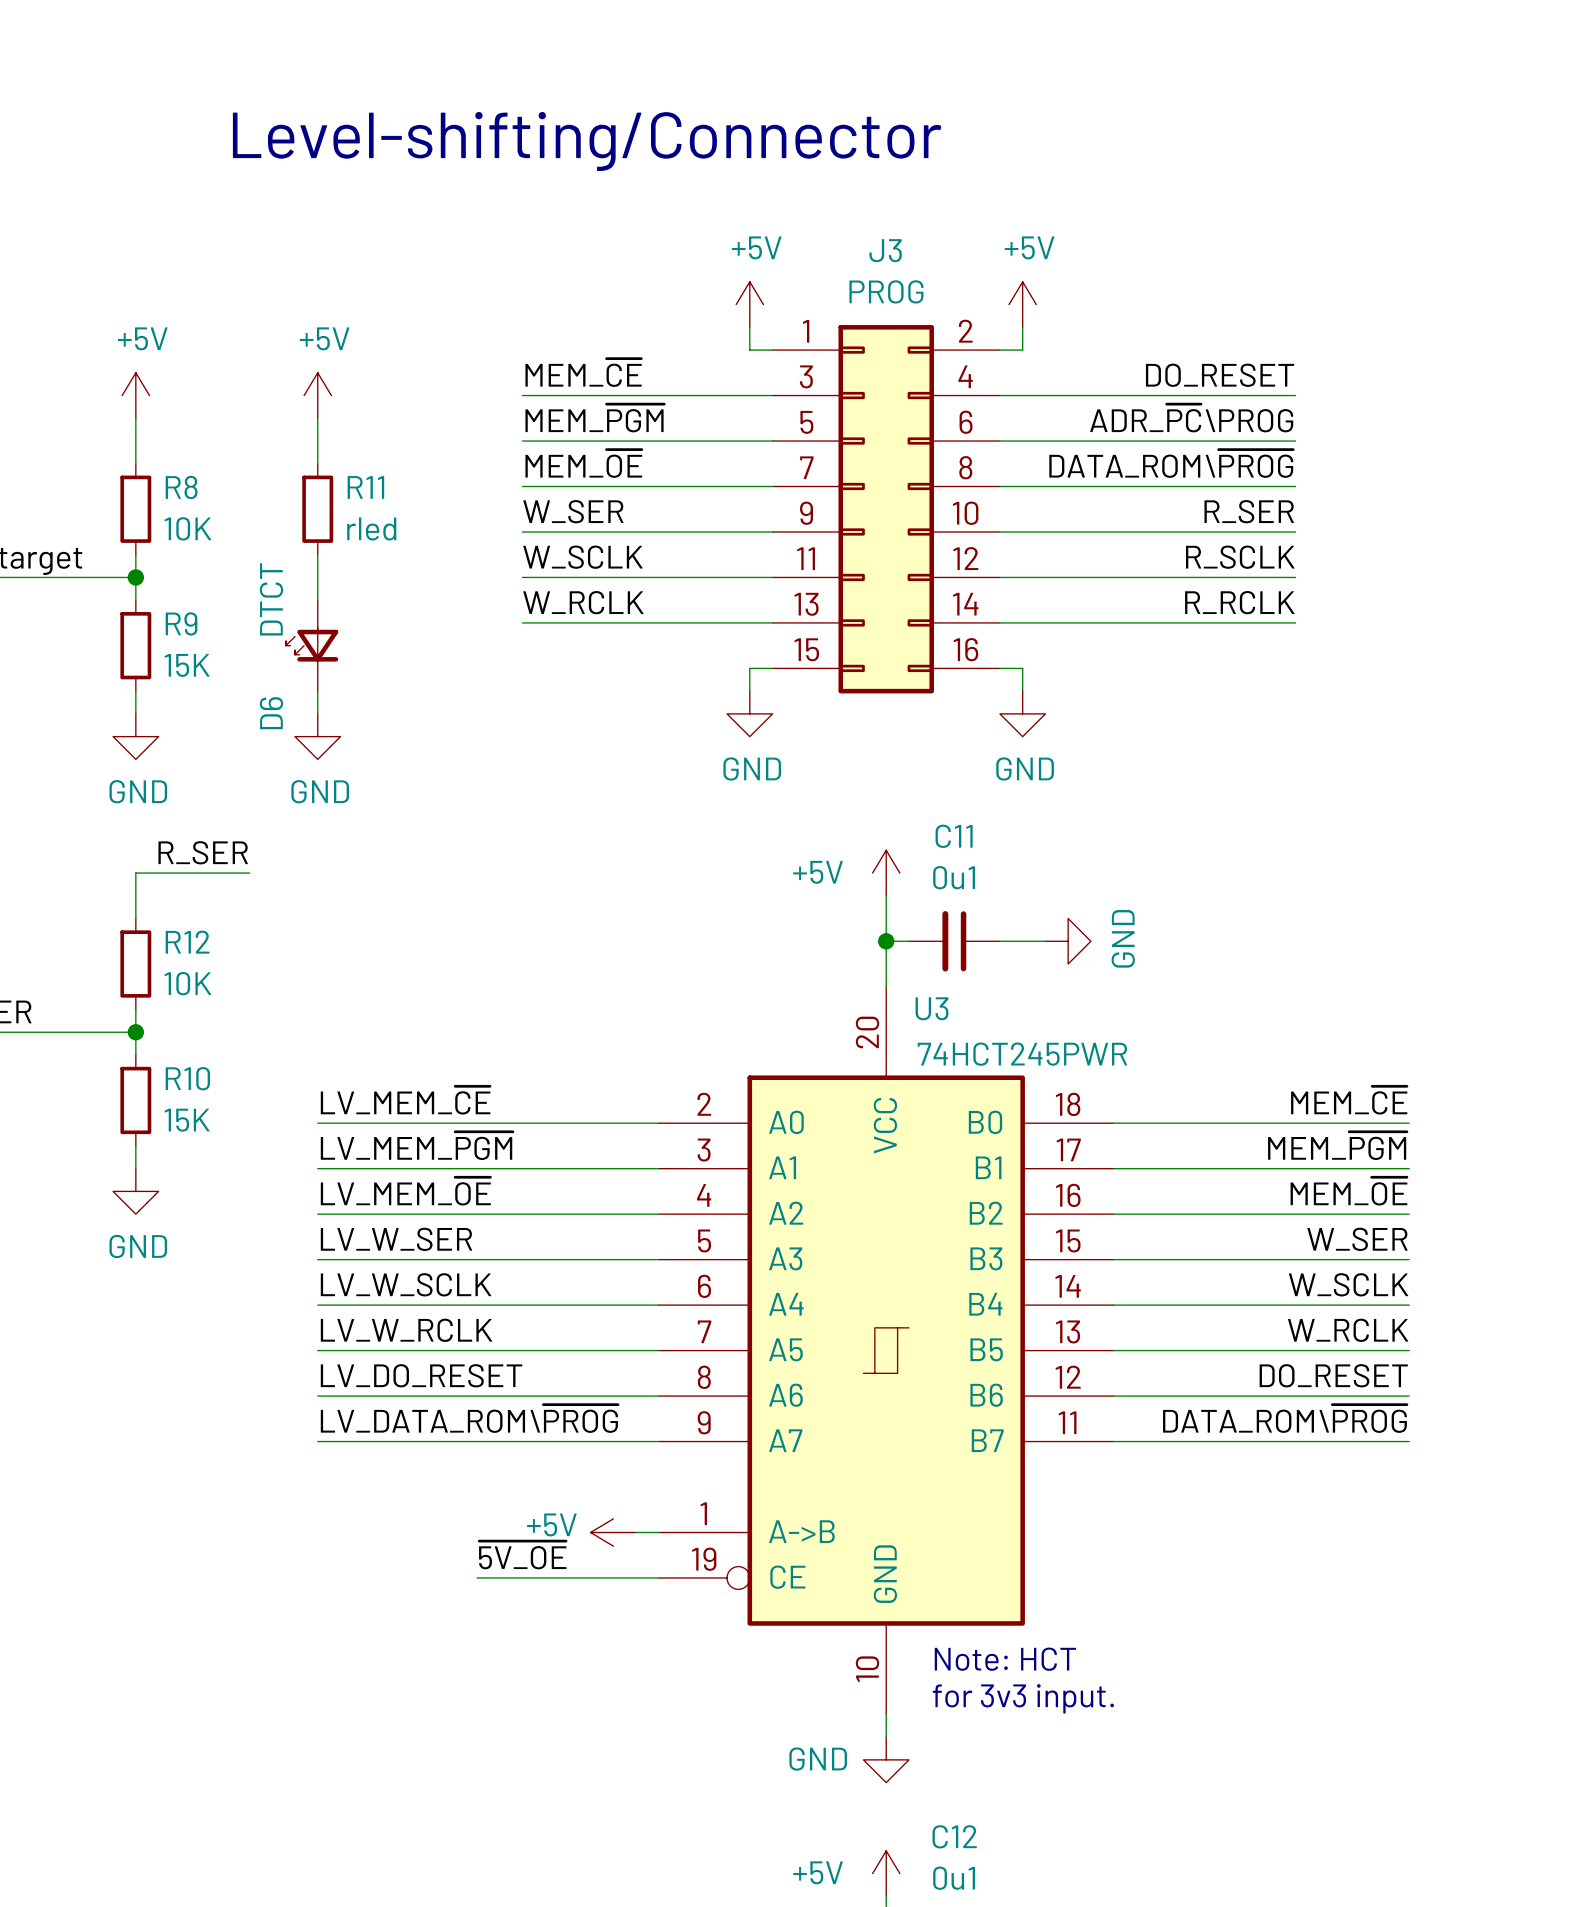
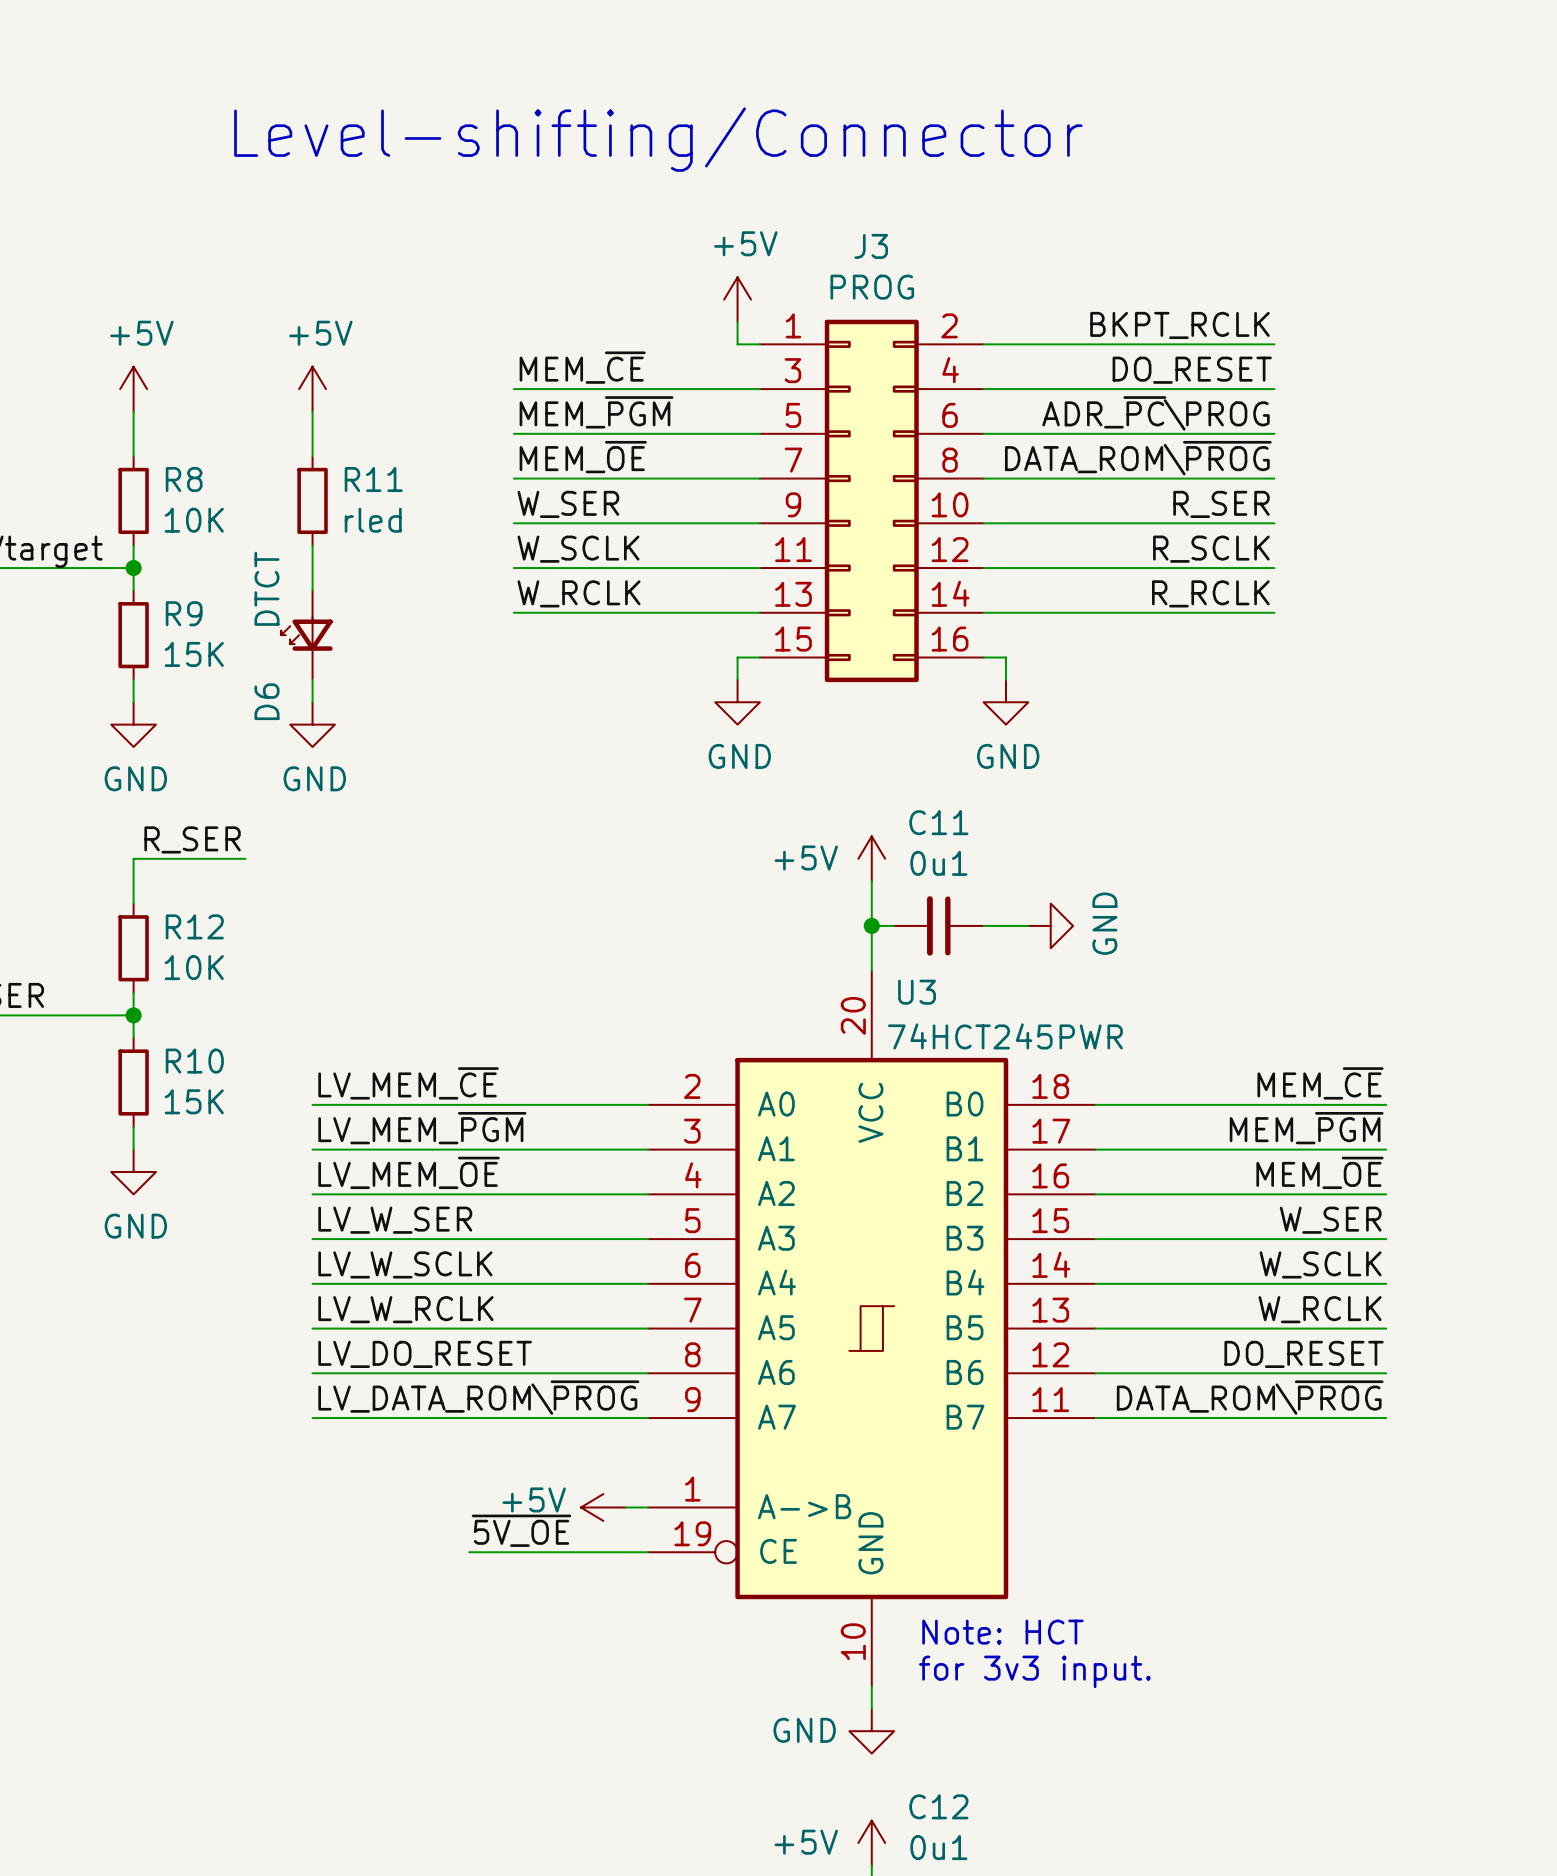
power symbol: +5V (1022, 304) -> none
wire: (1022, 327) (1022, 350) -> (1274, 344) (1005, 344)
label: none -> BKPT_RCLK (1179, 325)

